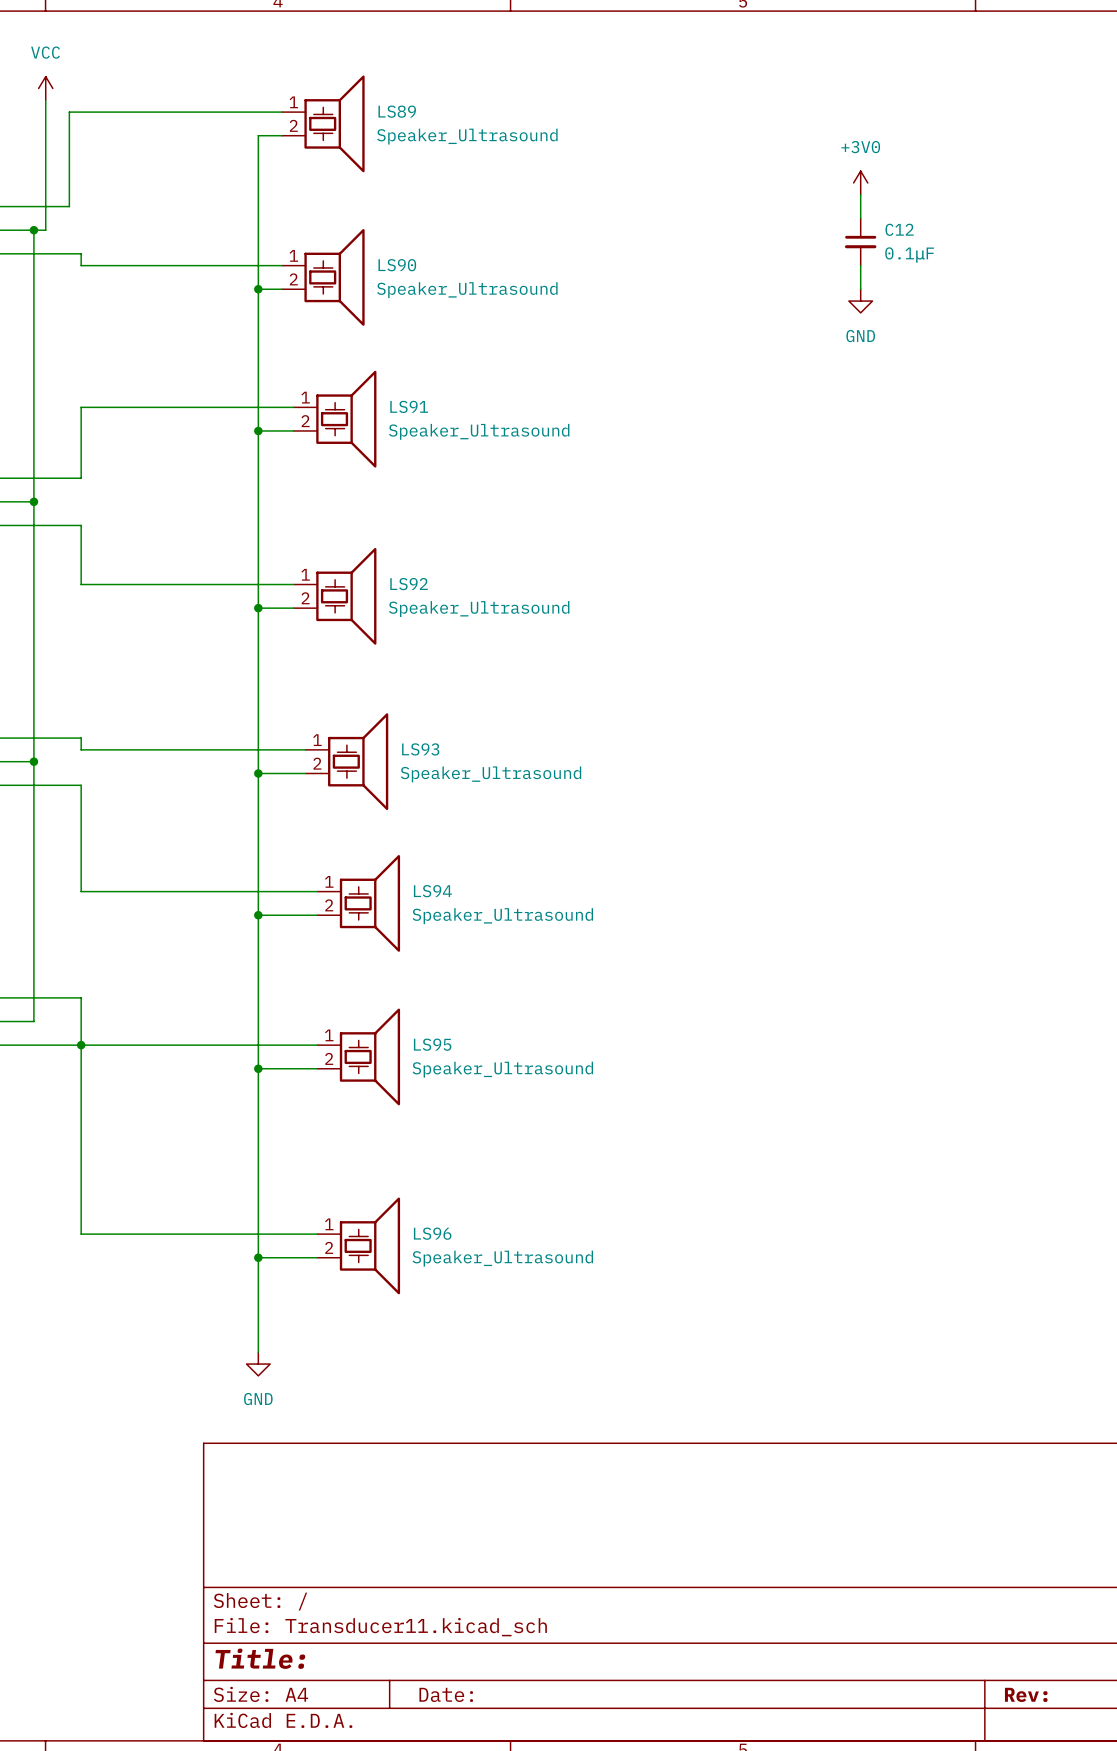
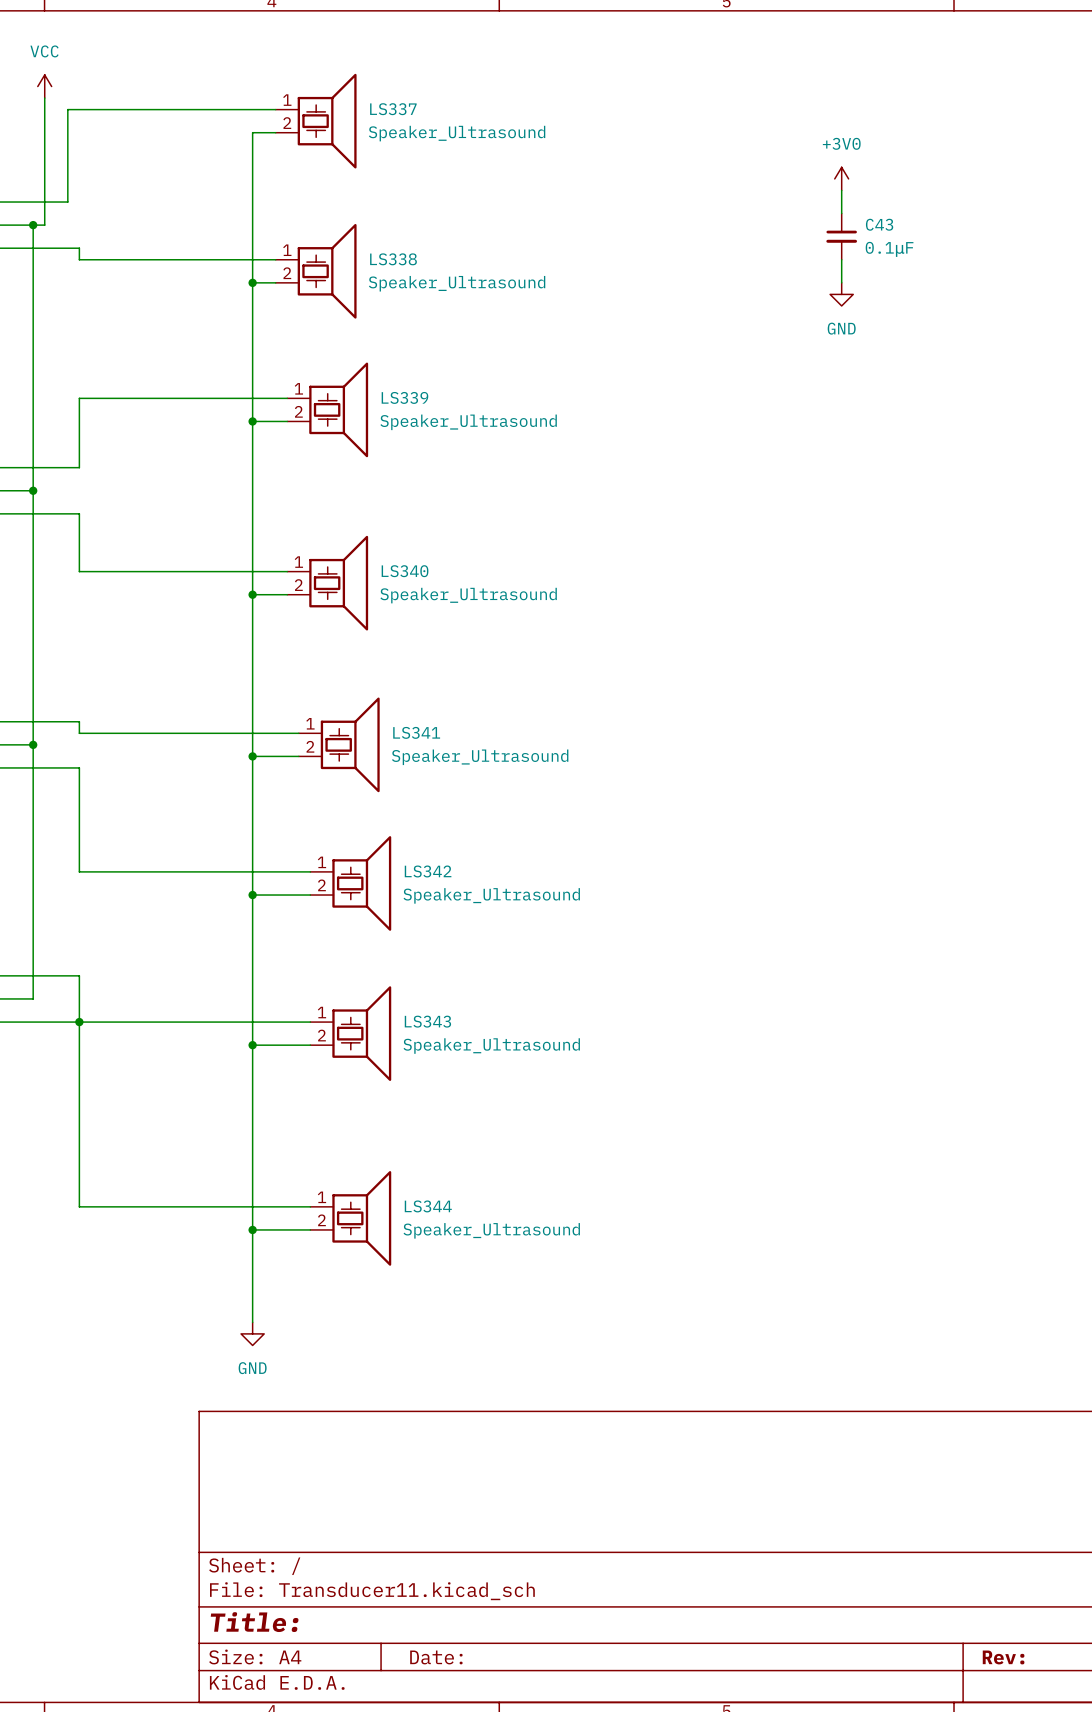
LS89 name: LS89 (397, 111) -> LS337 (393, 109)
C12 name: C12 (899, 229) -> C43 (879, 224)
LS90 name: LS90 (397, 265) -> LS338 (393, 259)
LS91 name: LS91 (409, 406) -> LS339 (404, 397)
LS92 name: LS92 (409, 584) -> LS340 (405, 571)
LS93 name: LS93 (420, 749) -> LS341 (416, 732)
LS94 name: LS94 (432, 891) -> LS342 (428, 871)
LS95 name: LS95 (432, 1044) -> LS343 (427, 1021)
LS96 name: LS96 (432, 1233) -> LS344 (428, 1206)

